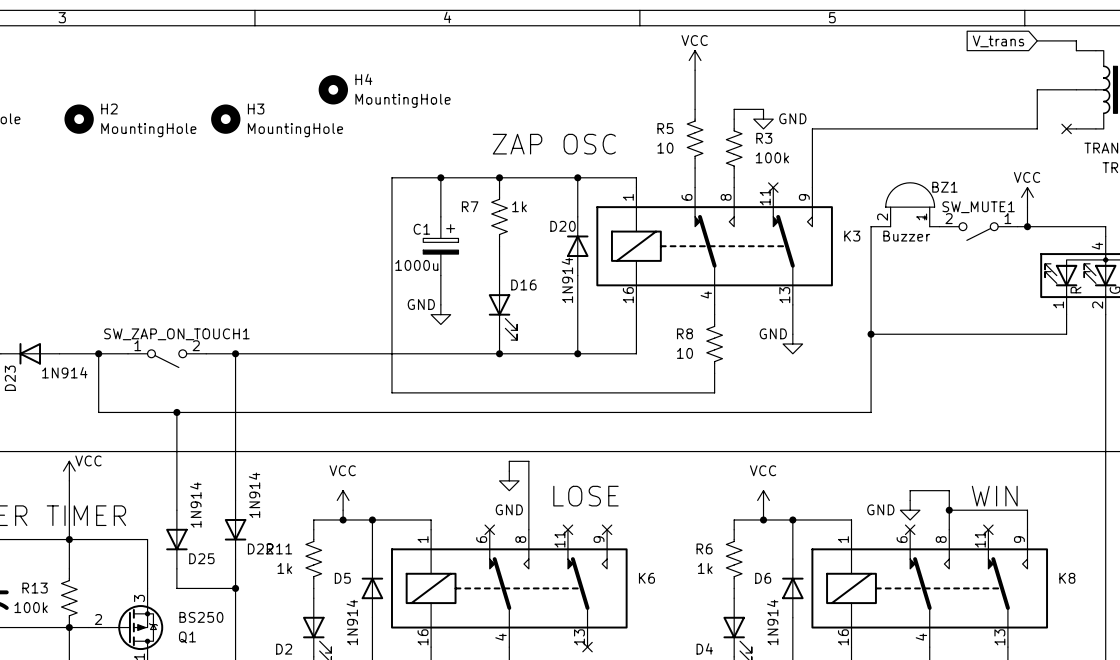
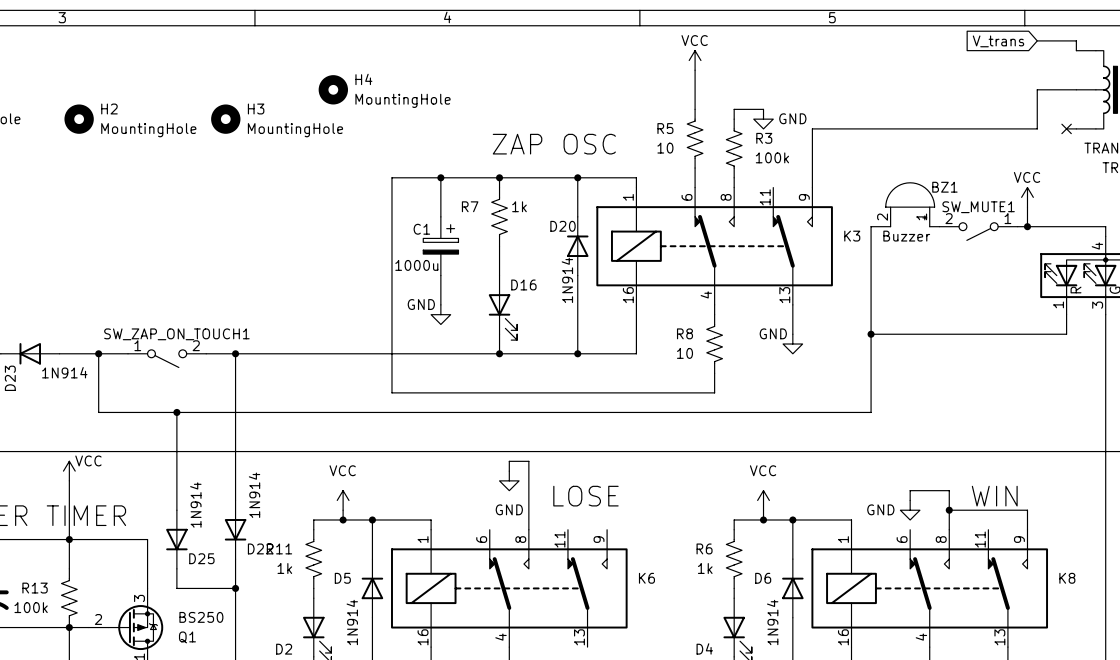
no-connect mark: (773, 187) -> none
part pin number: 2 (1097, 305) -> 3 (1097, 305)
no-connect mark: (489, 529) -> none
no-connect mark: (567, 529) -> none
no-connect mark: (607, 529) -> none
no-connect mark: (910, 529) -> none
no-connect mark: (988, 529) -> none
no-connect mark: (587, 647) -> none

